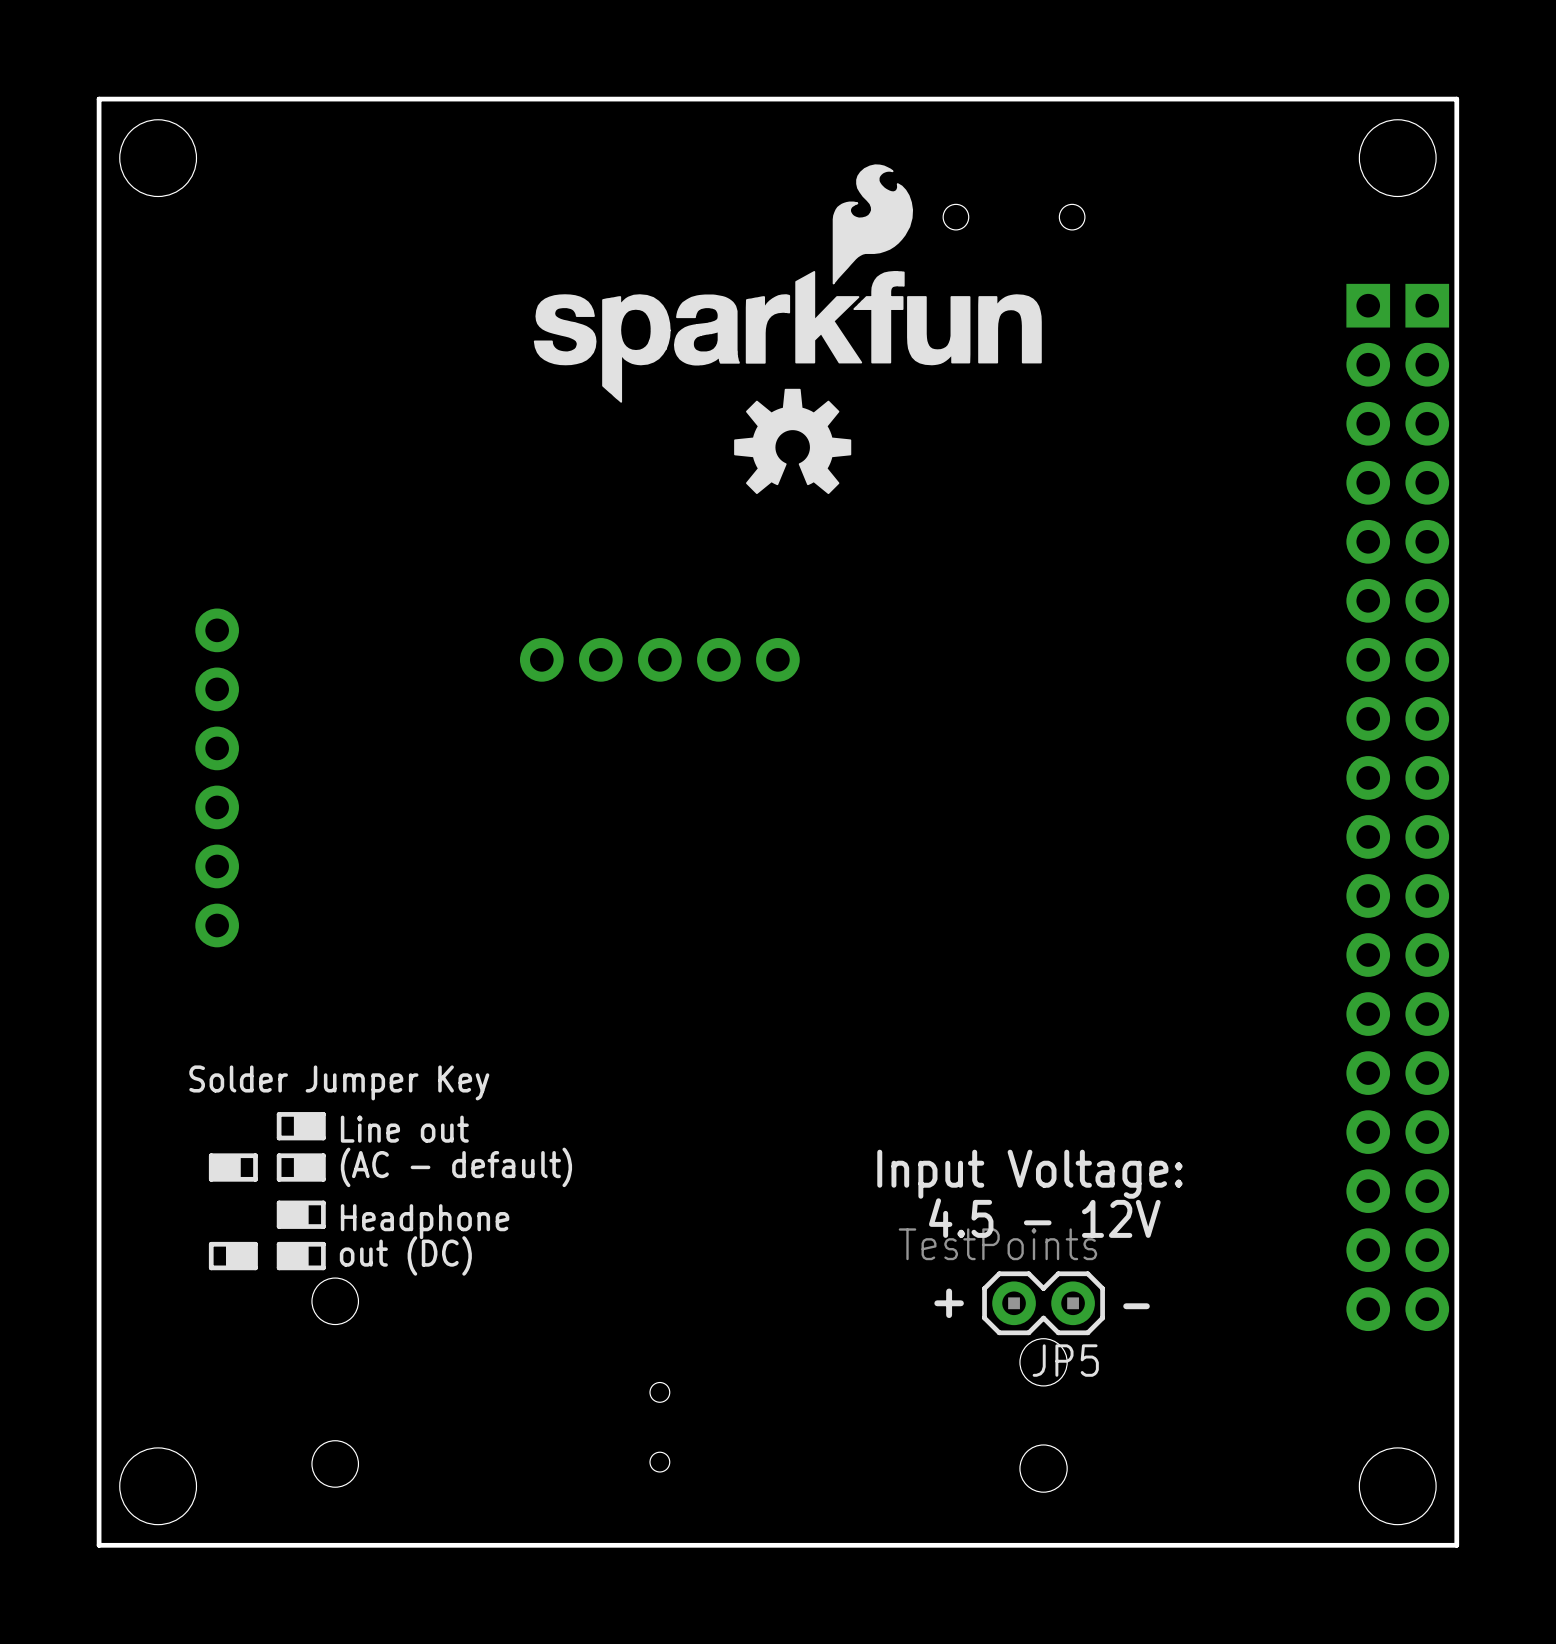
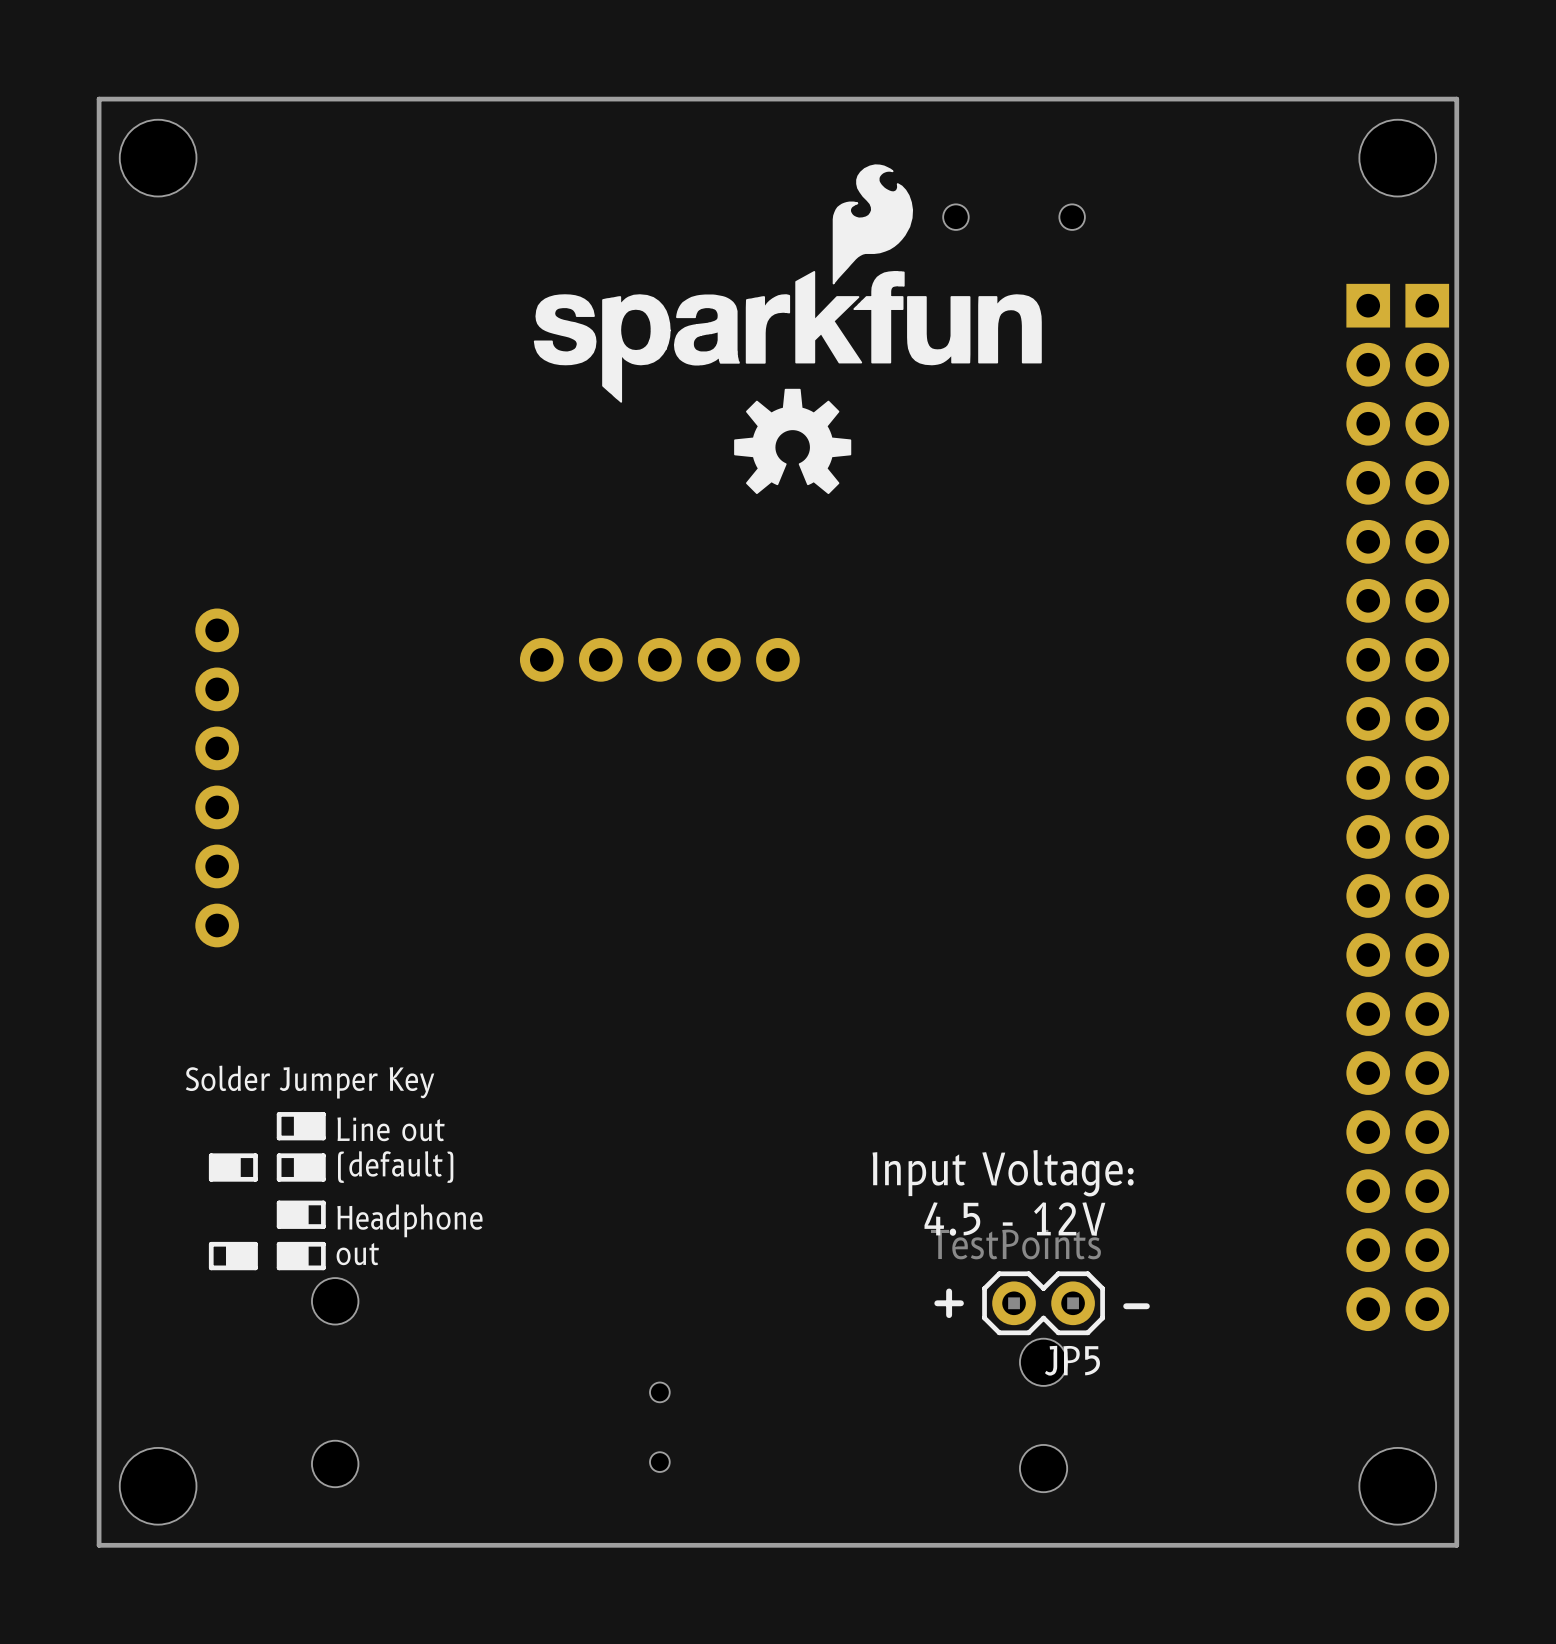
text: (AC - default) (456, 1167) -> (default) (395, 1167)
text: out (DC) (405, 1255) -> out (357, 1254)

